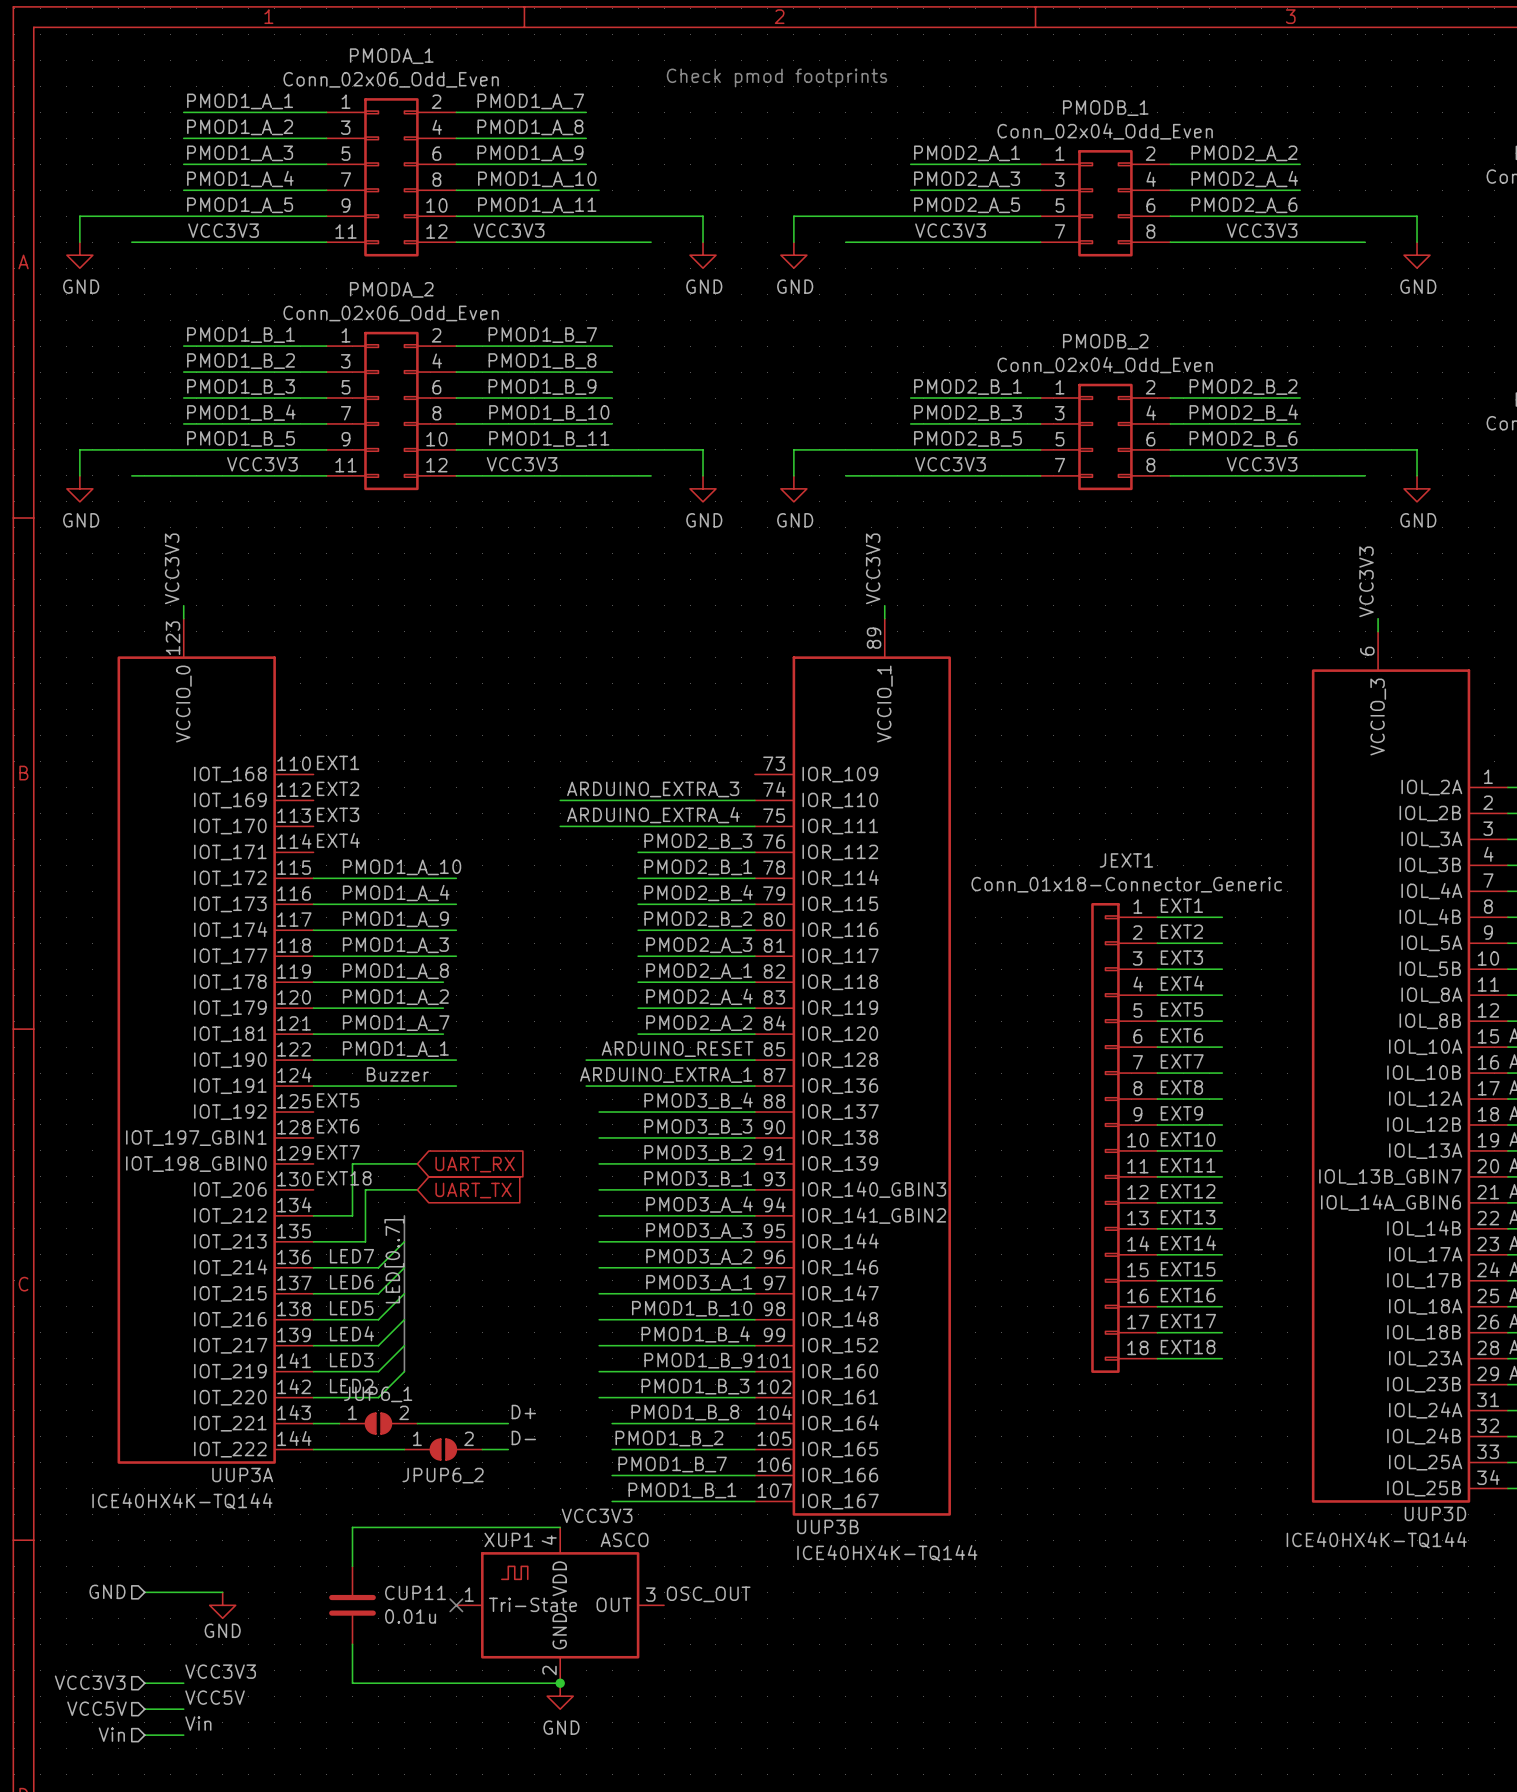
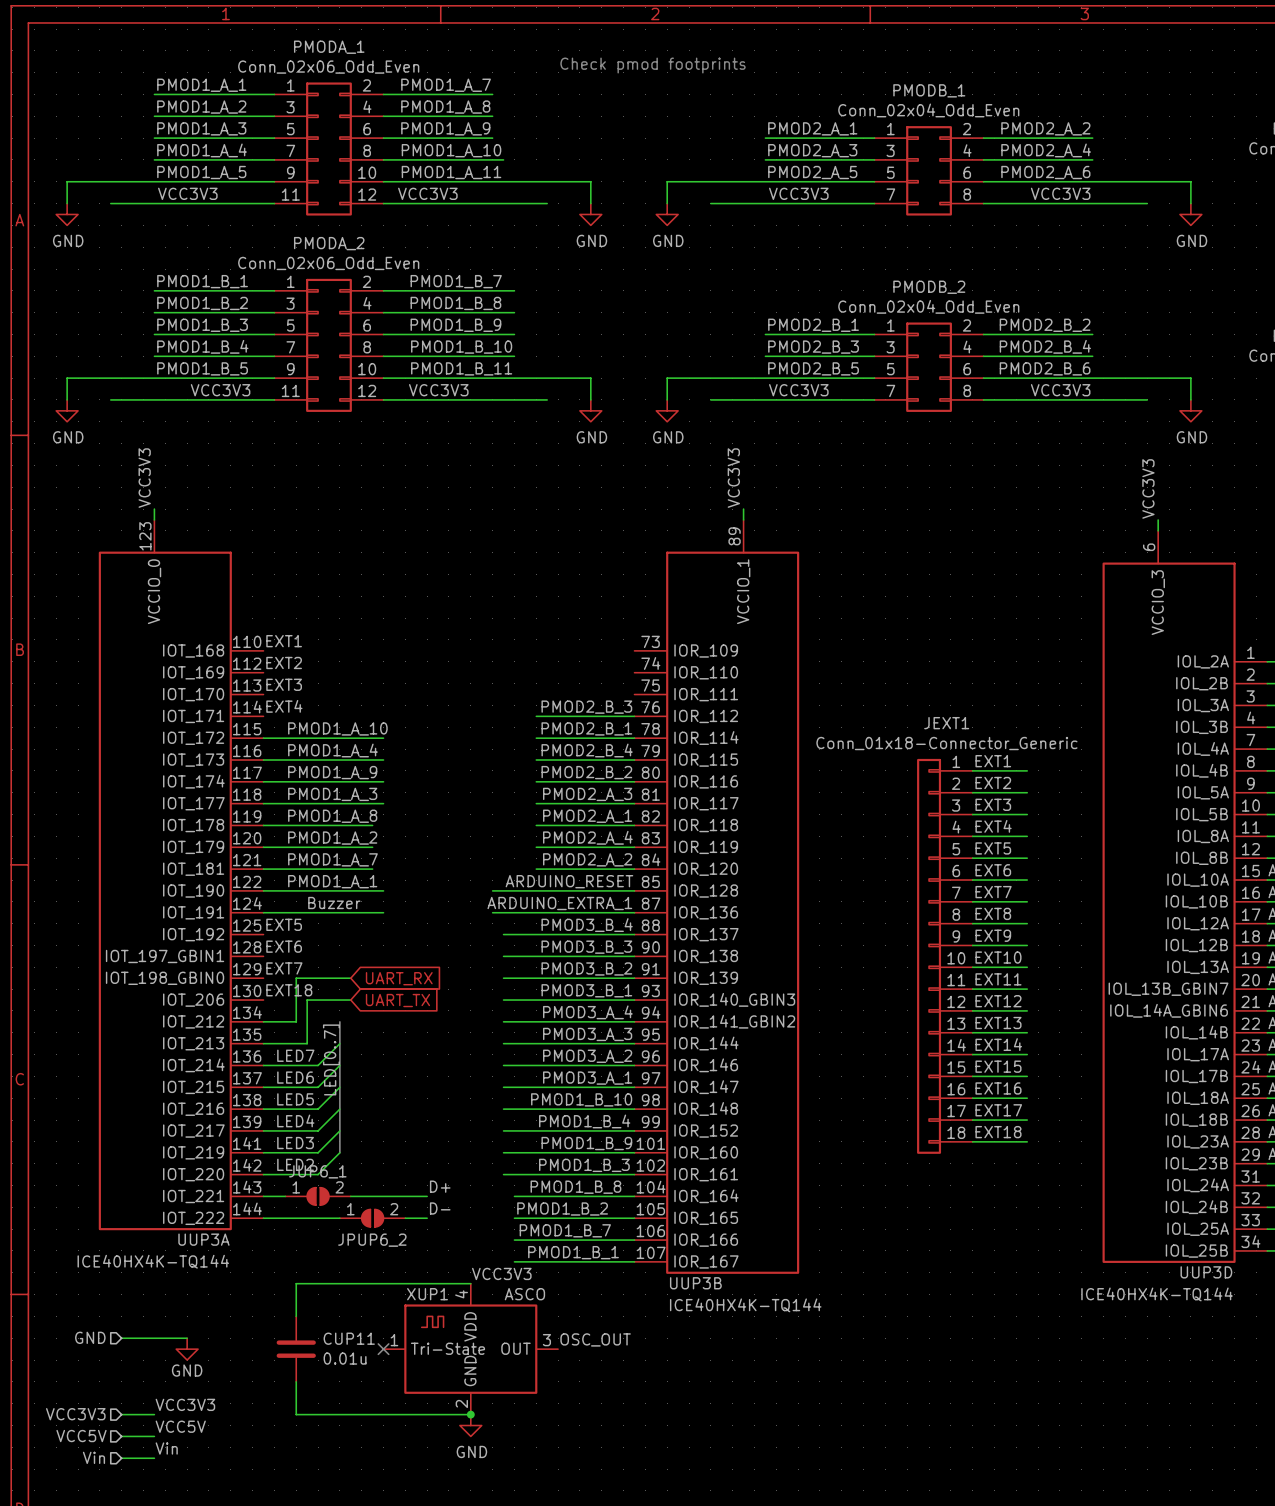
label: ARDUINO_EXTRA_3 (653, 789) -> none
wire: (560, 800) (754, 800) -> none
label: ARDUINO_EXTRA_4 (653, 815) -> none
wire: (560, 826) (754, 826) -> none

